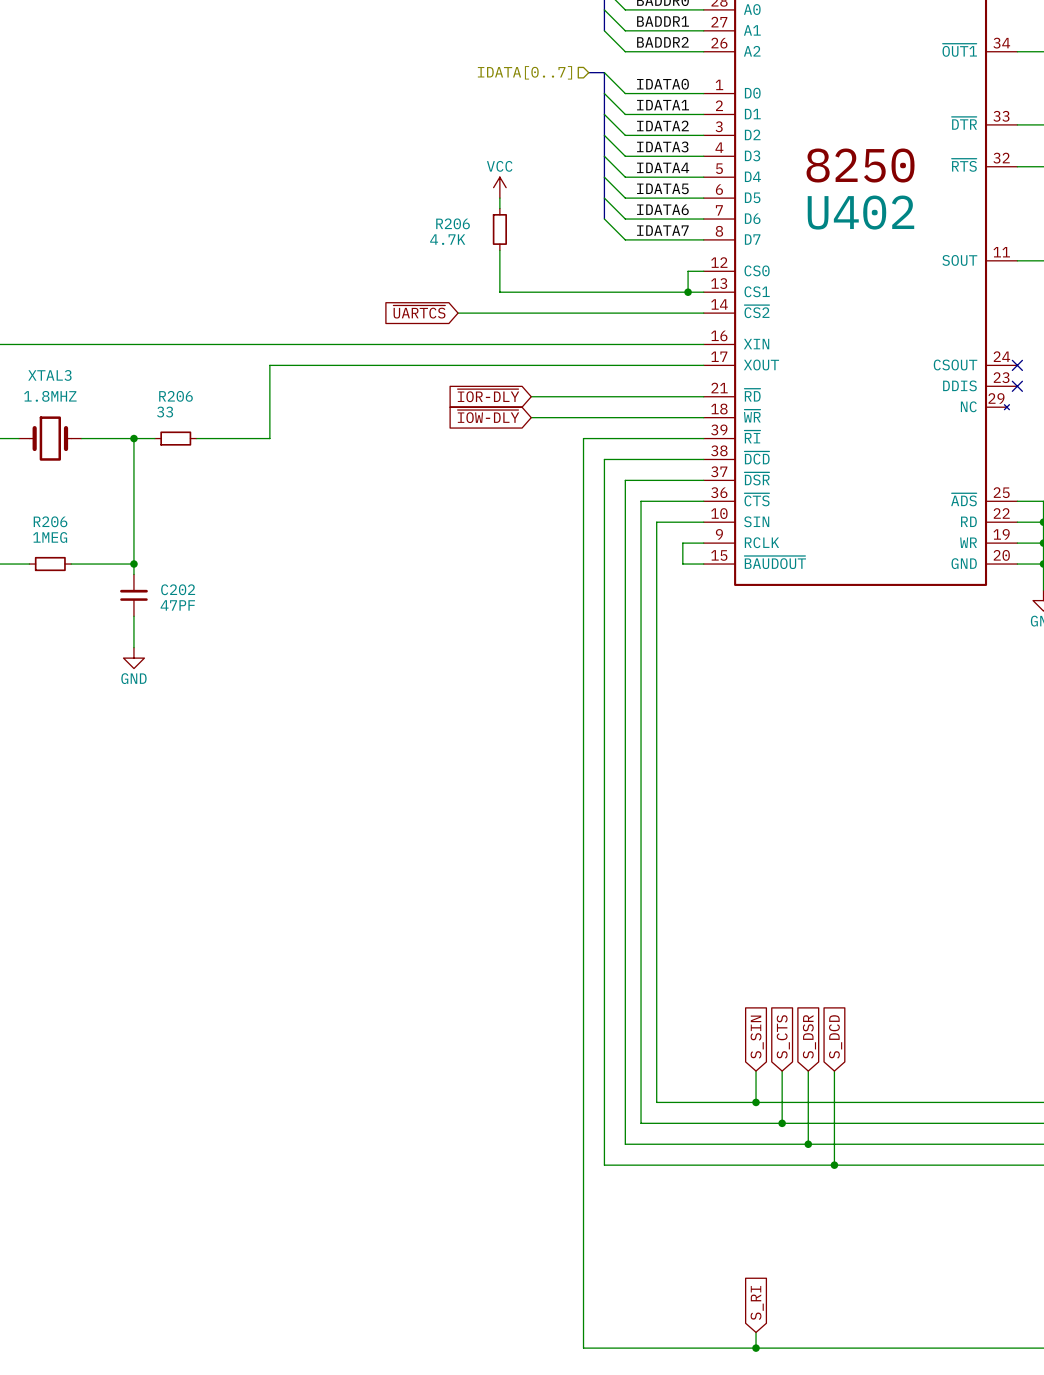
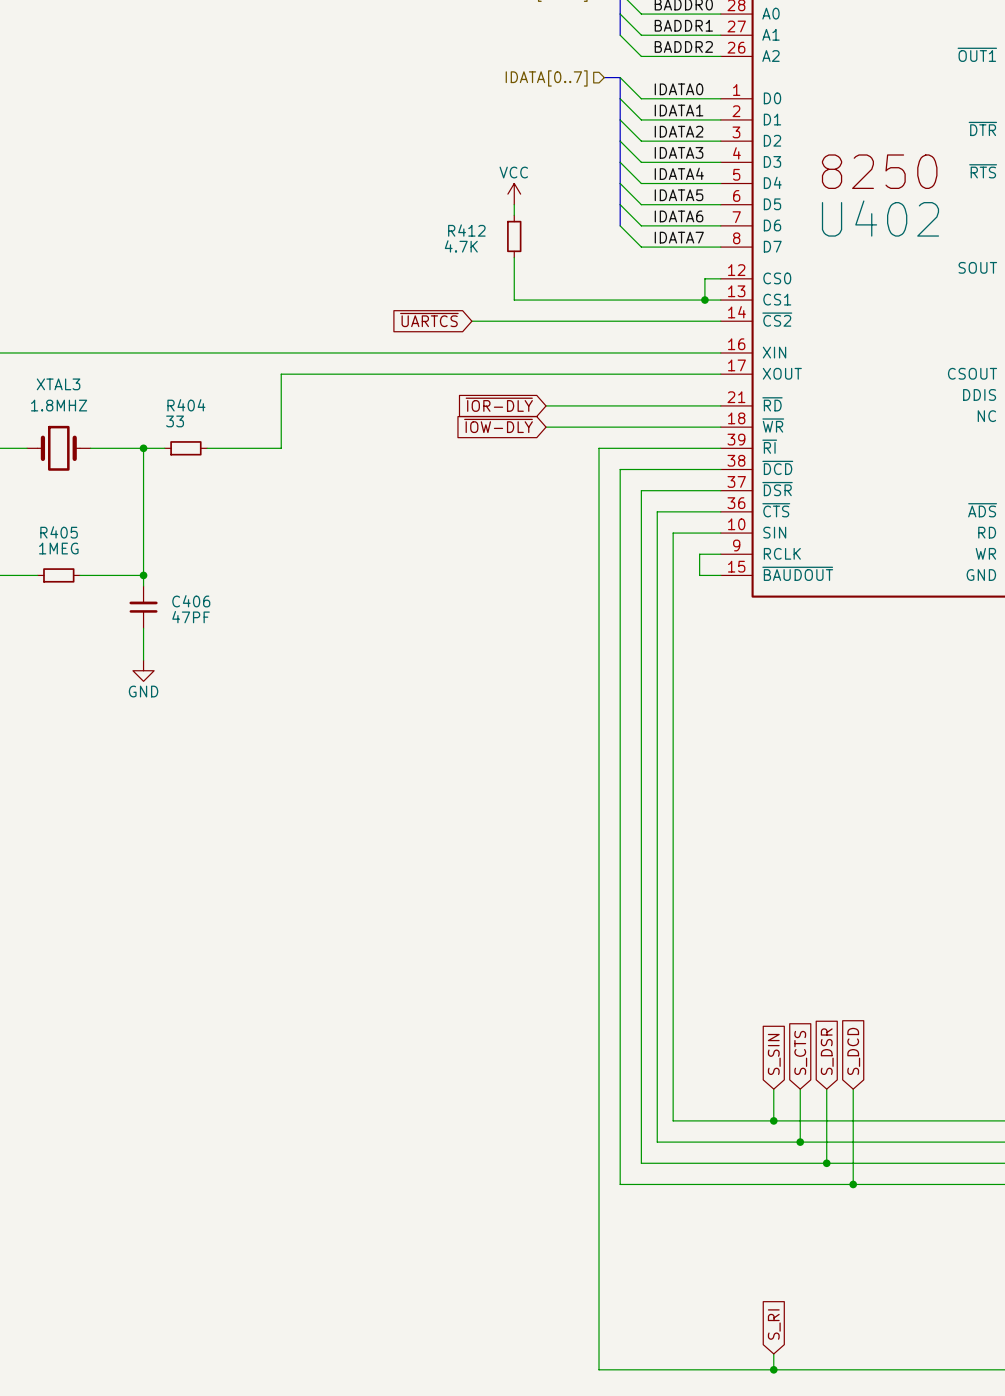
R206 name: R206 (453, 223) -> R412 (466, 230)
R206 name: R206 (175, 396) -> R404 (186, 405)
R206 name: R206 (50, 521) -> R405 (59, 532)
C202 name: C202 (178, 589) -> C406 (191, 601)

